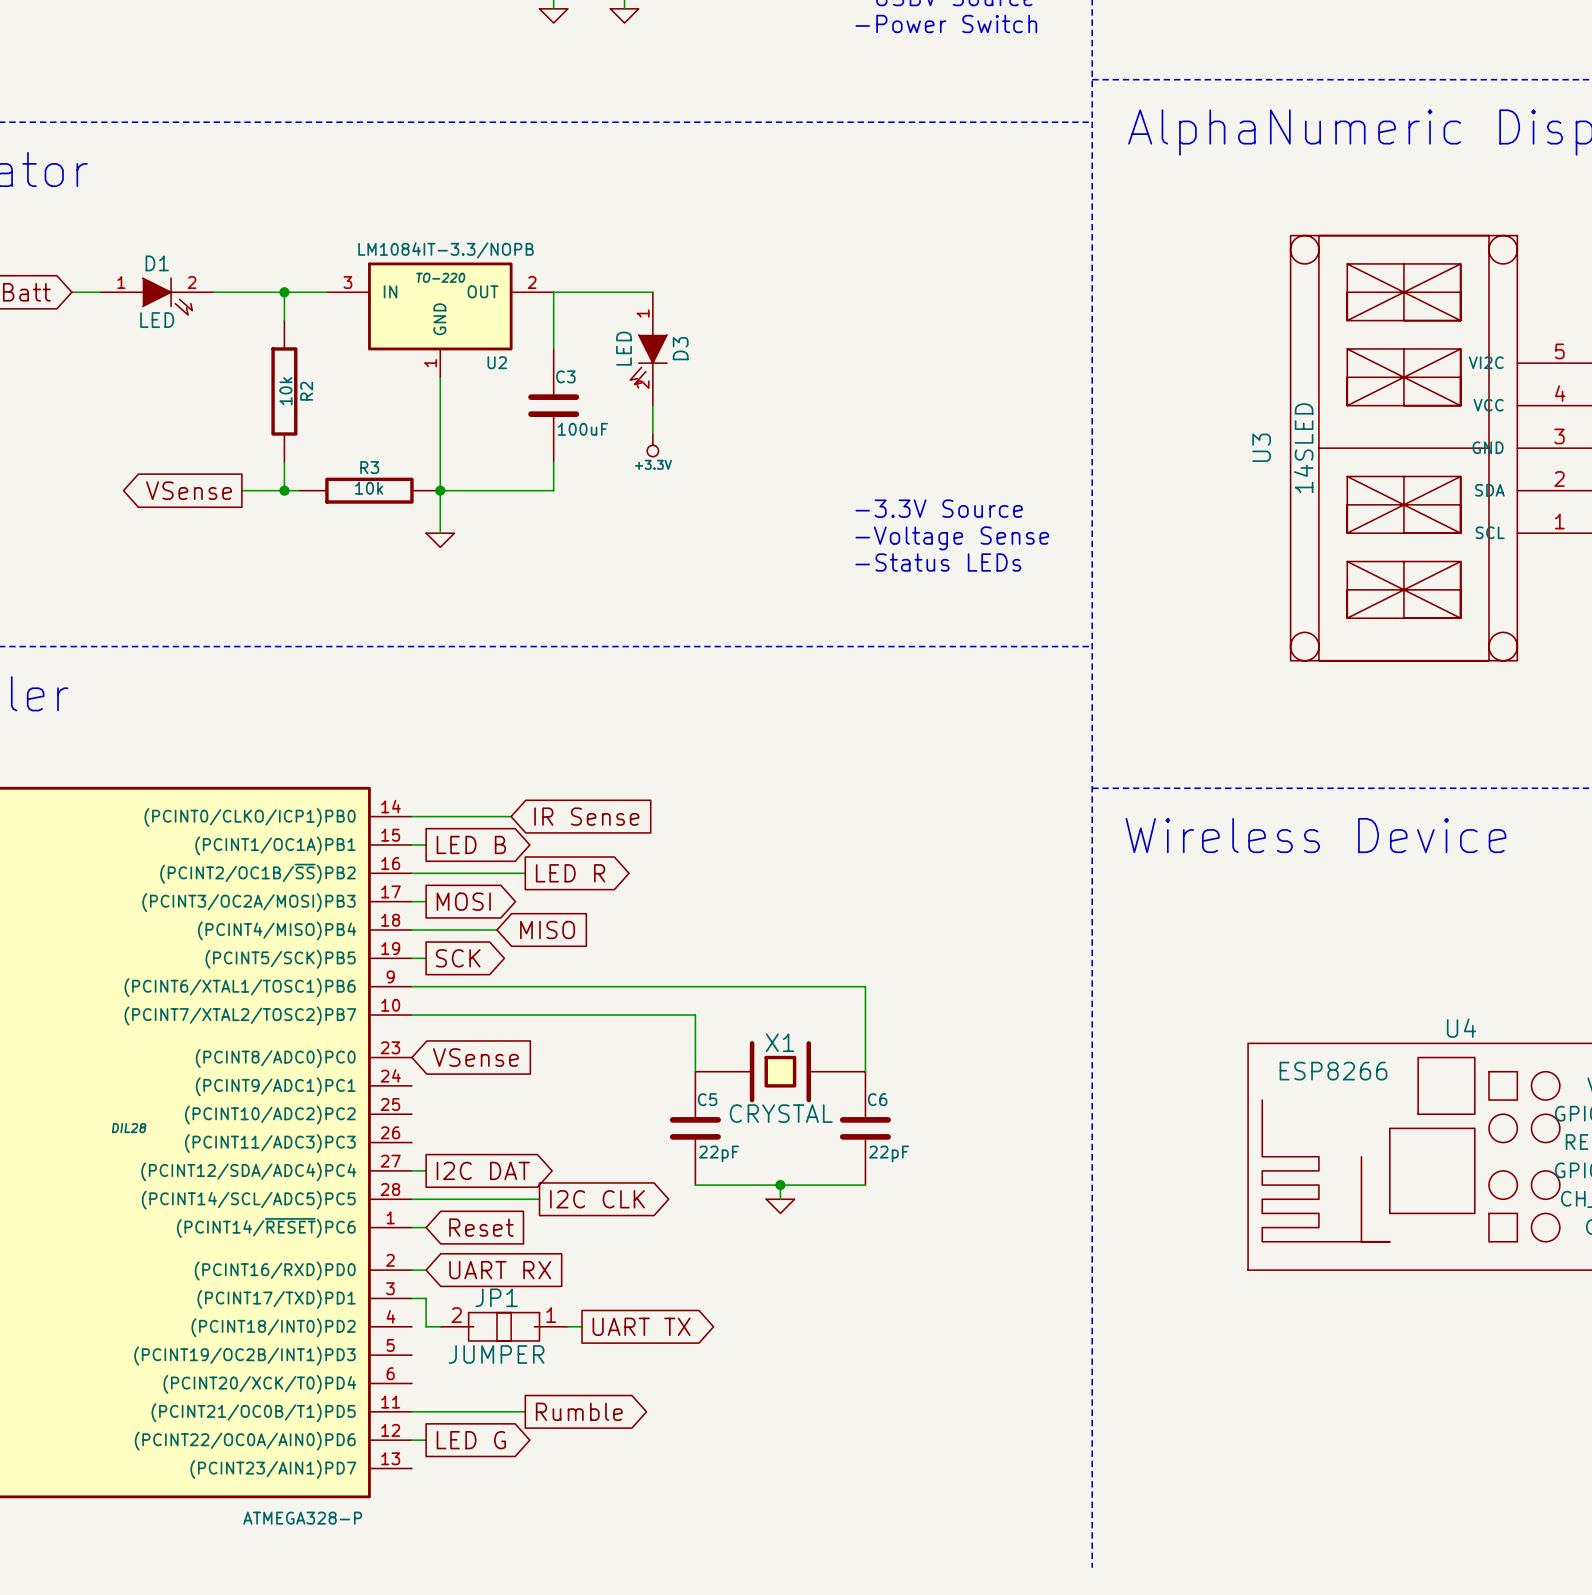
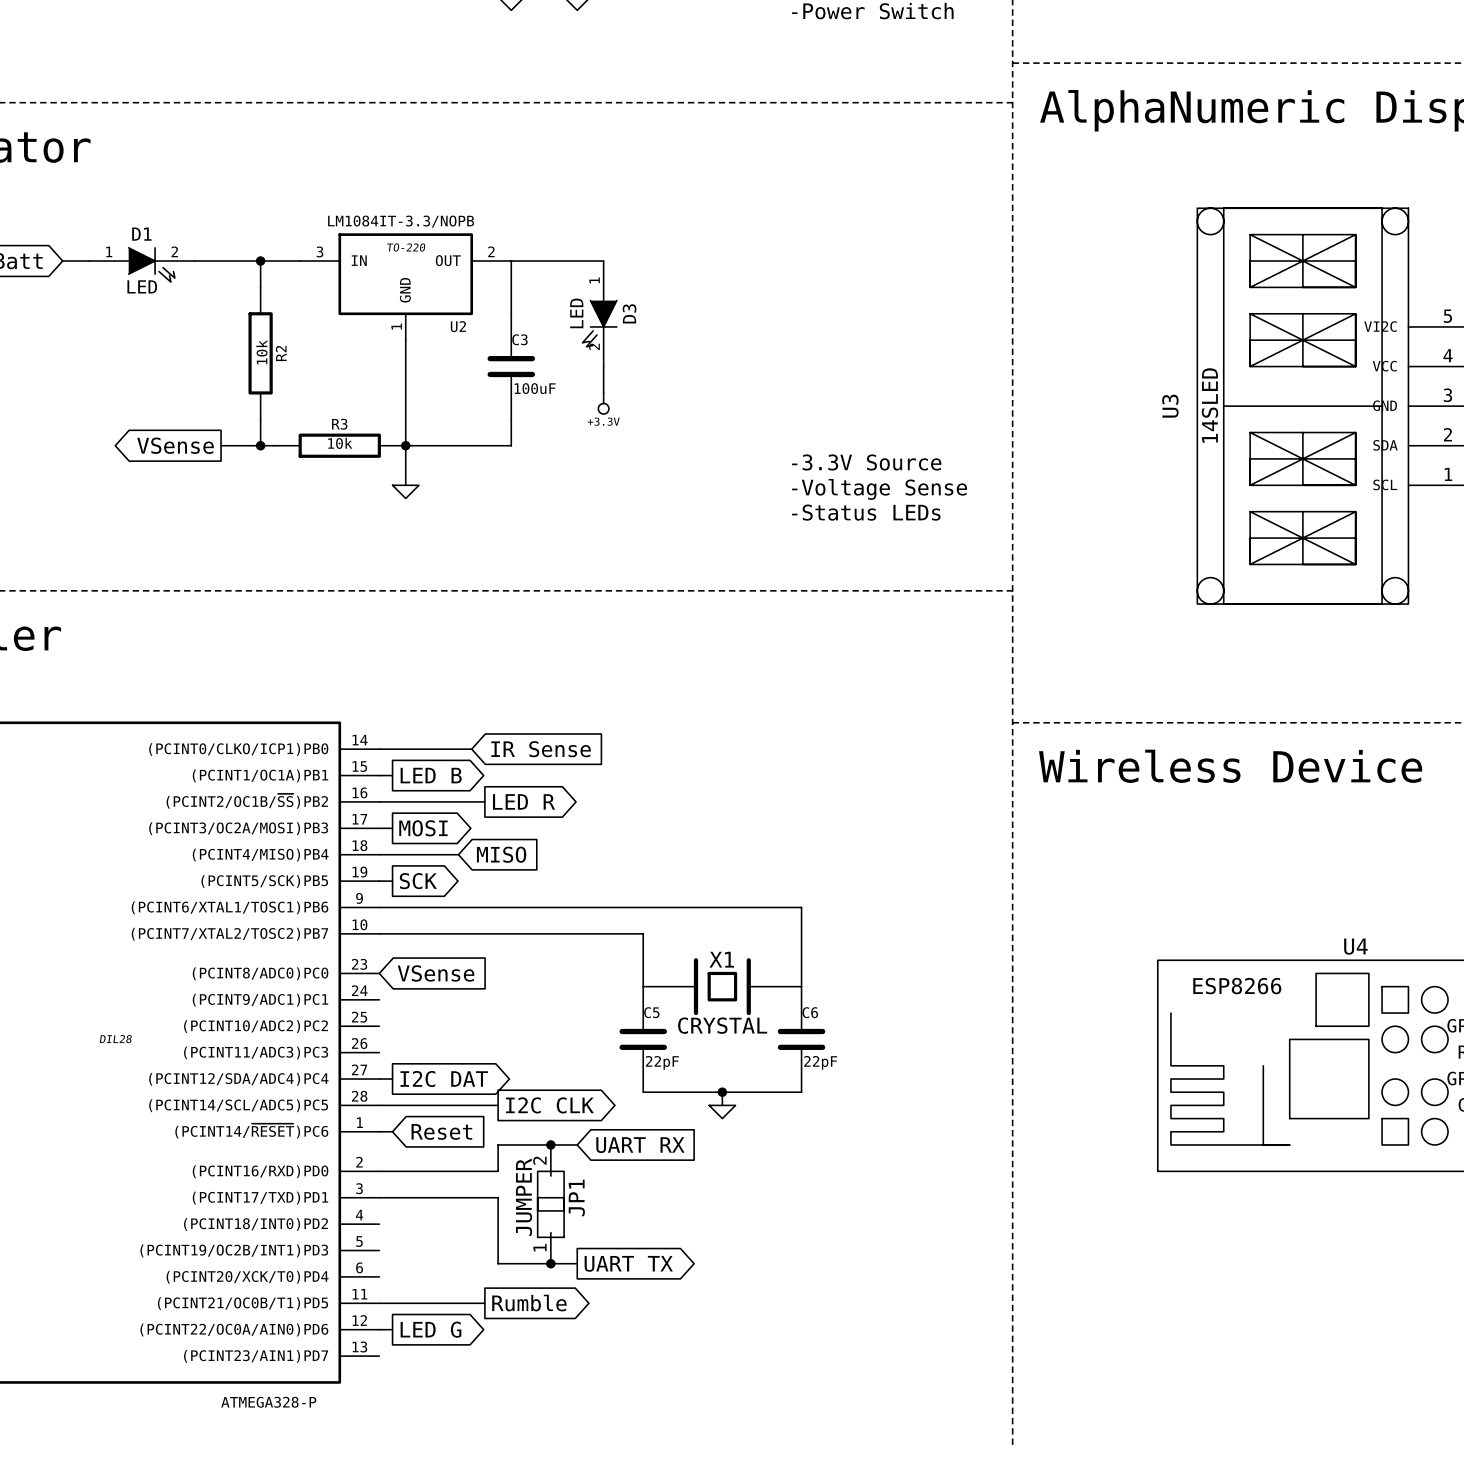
junction: none -> (550, 1144)
wire: none -> (577, 1144) (498, 1144) (498, 1171) (392, 1171)
global label position: UART RX (500, 1270) -> UART RX (640, 1145)
wire: (426, 1298) (426, 1326) (440, 1326) -> (392, 1197) (498, 1197) (498, 1263) (577, 1263)
JP1 rotation: 0° (504, 1326) -> 90° clockwise (550, 1204)
JP1 position: (504, 1326) -> (550, 1204)
wire: (567, 1326) (582, 1326) -> none
global label position: UART TX (641, 1326) -> UART TX (628, 1263)
junction: none -> (550, 1263)

